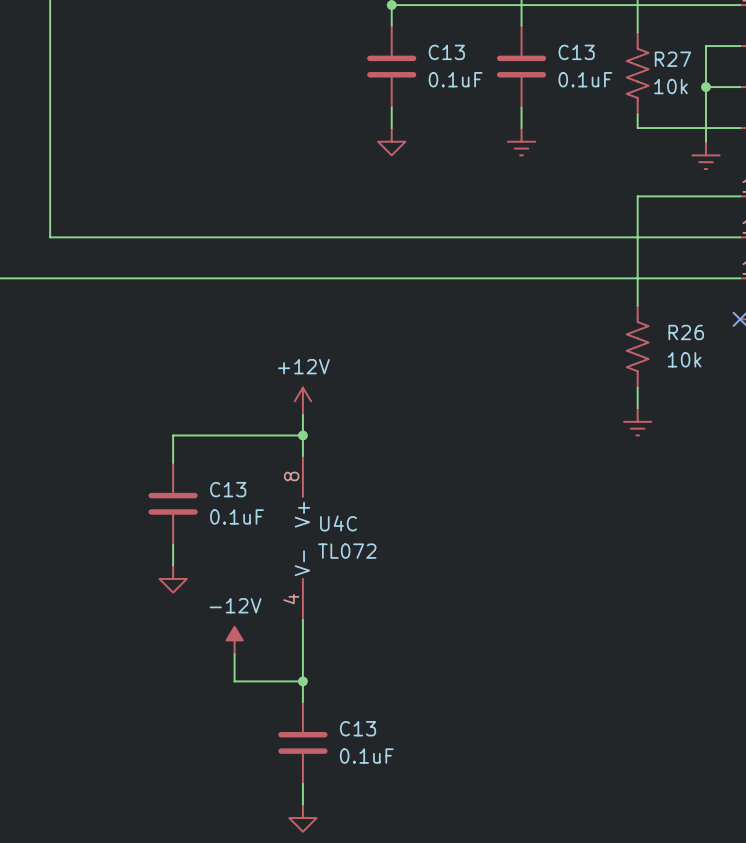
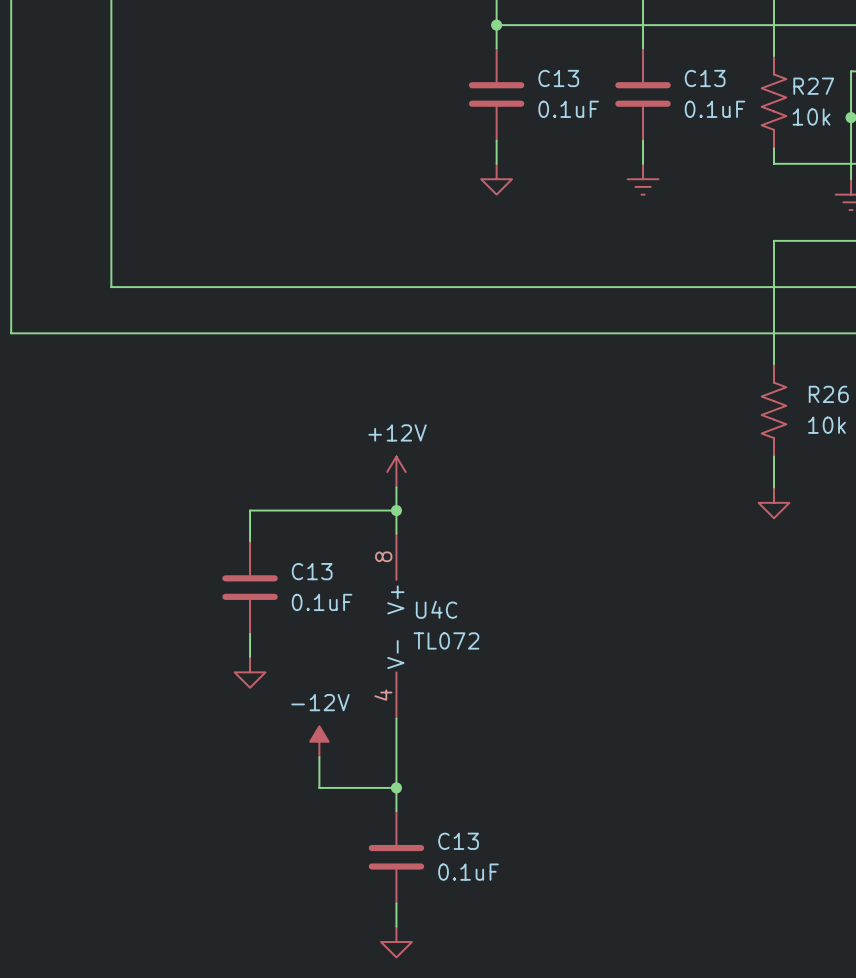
power symbol shape: [624, 408, 652, 436] -> [758, 487, 790, 519]

